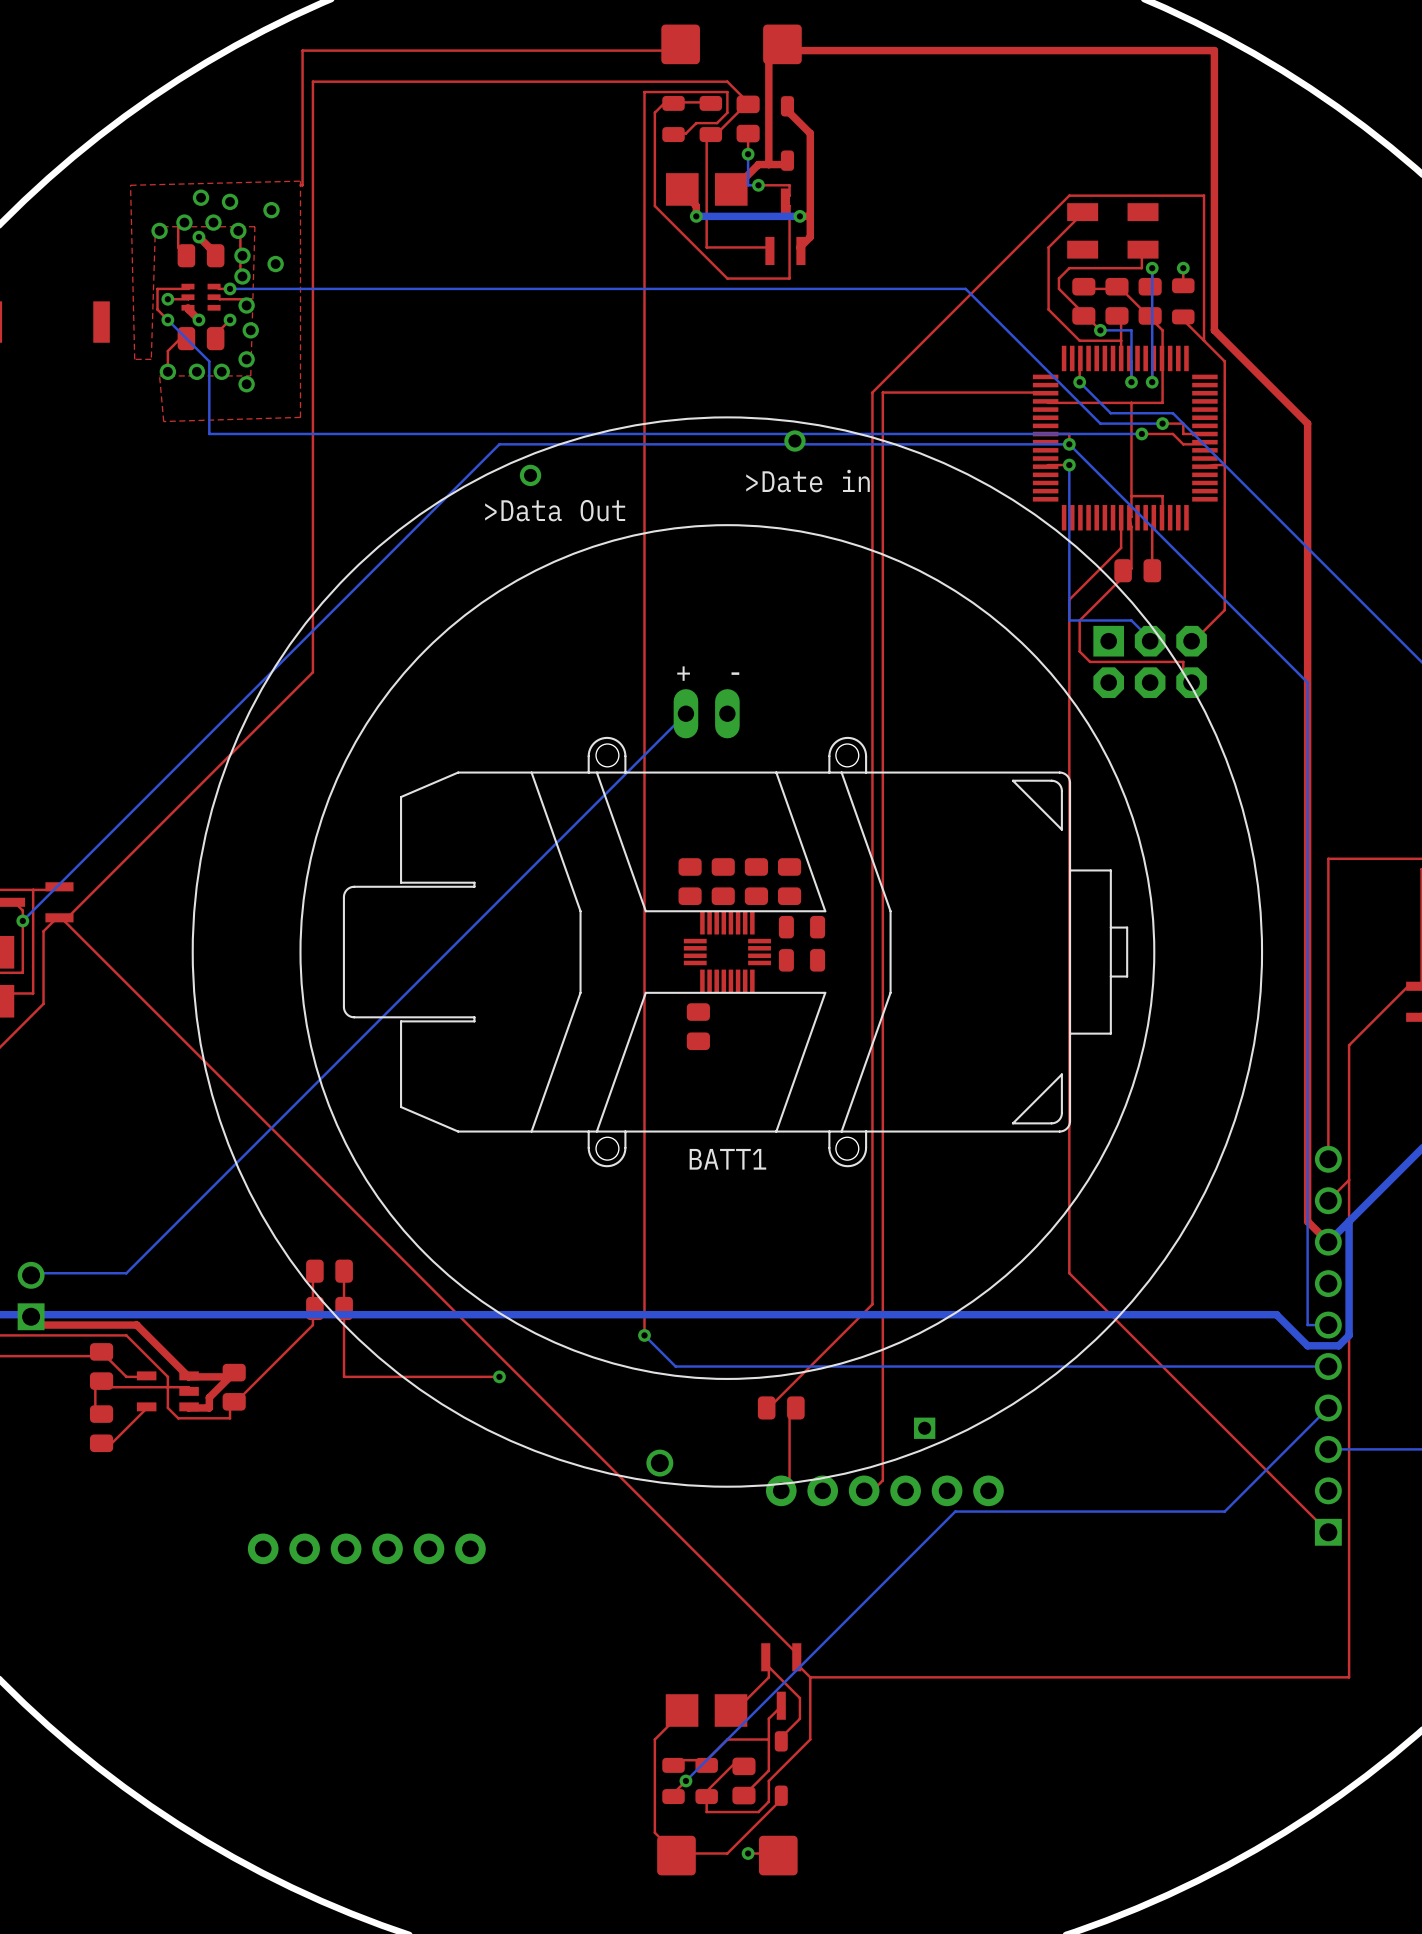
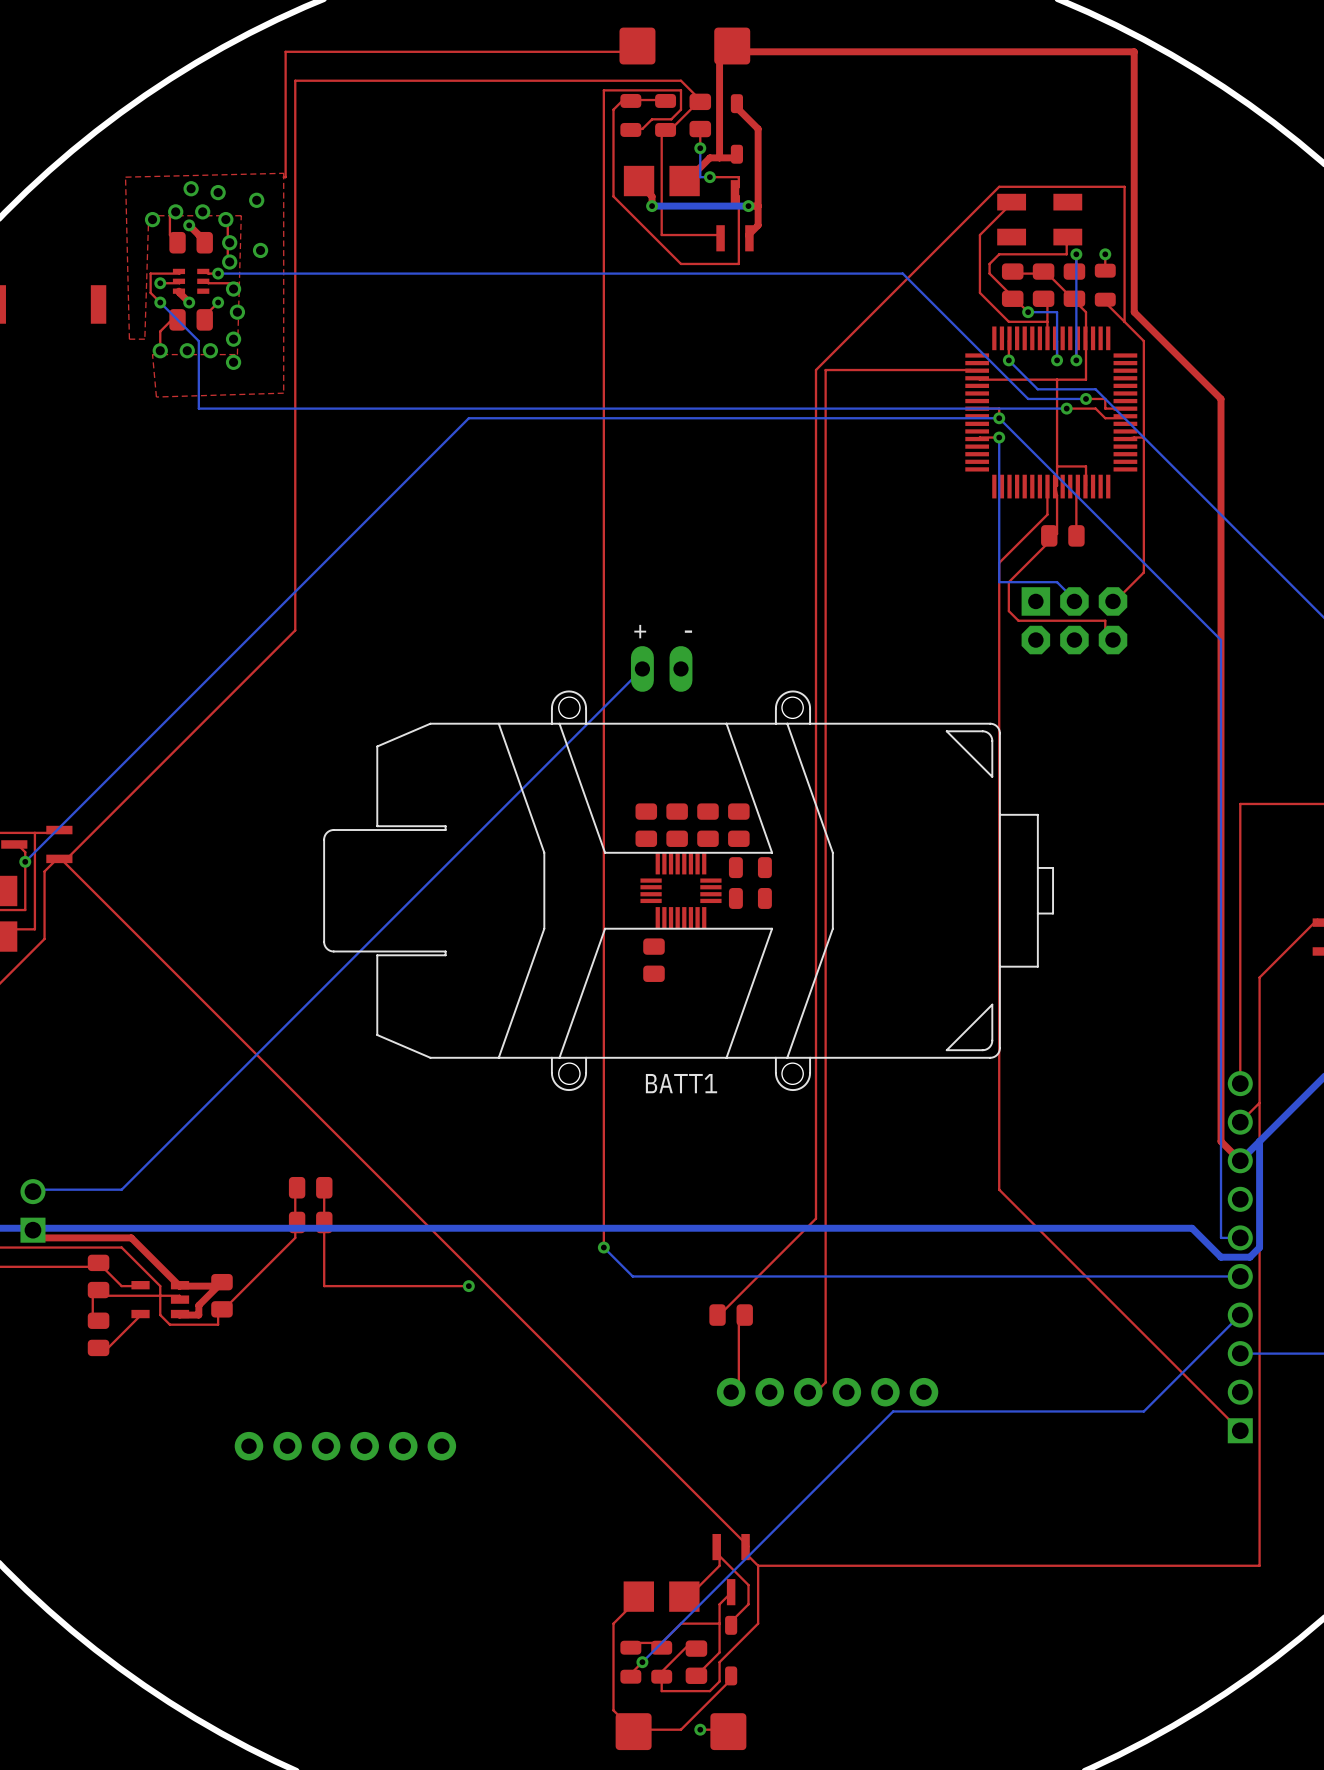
part: (727, 952) -> none

